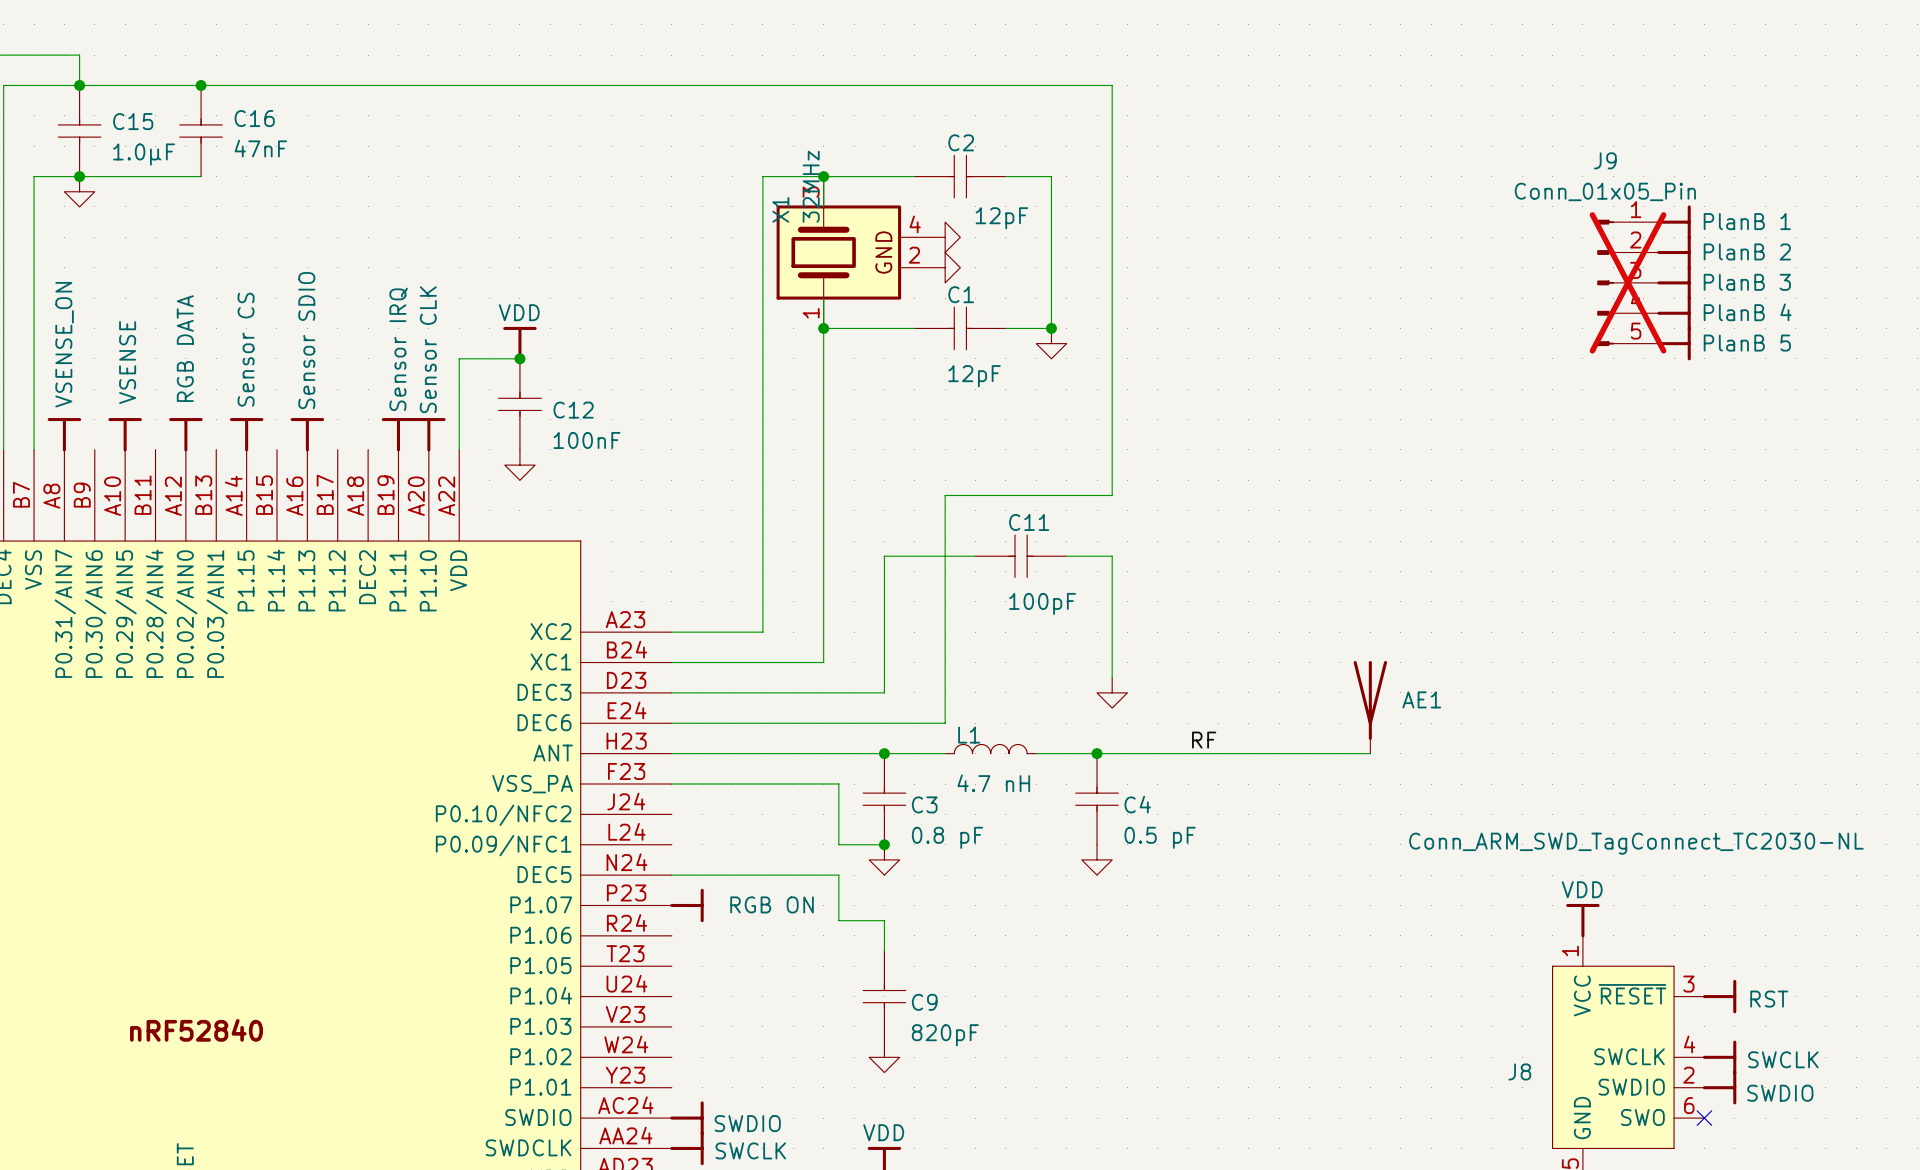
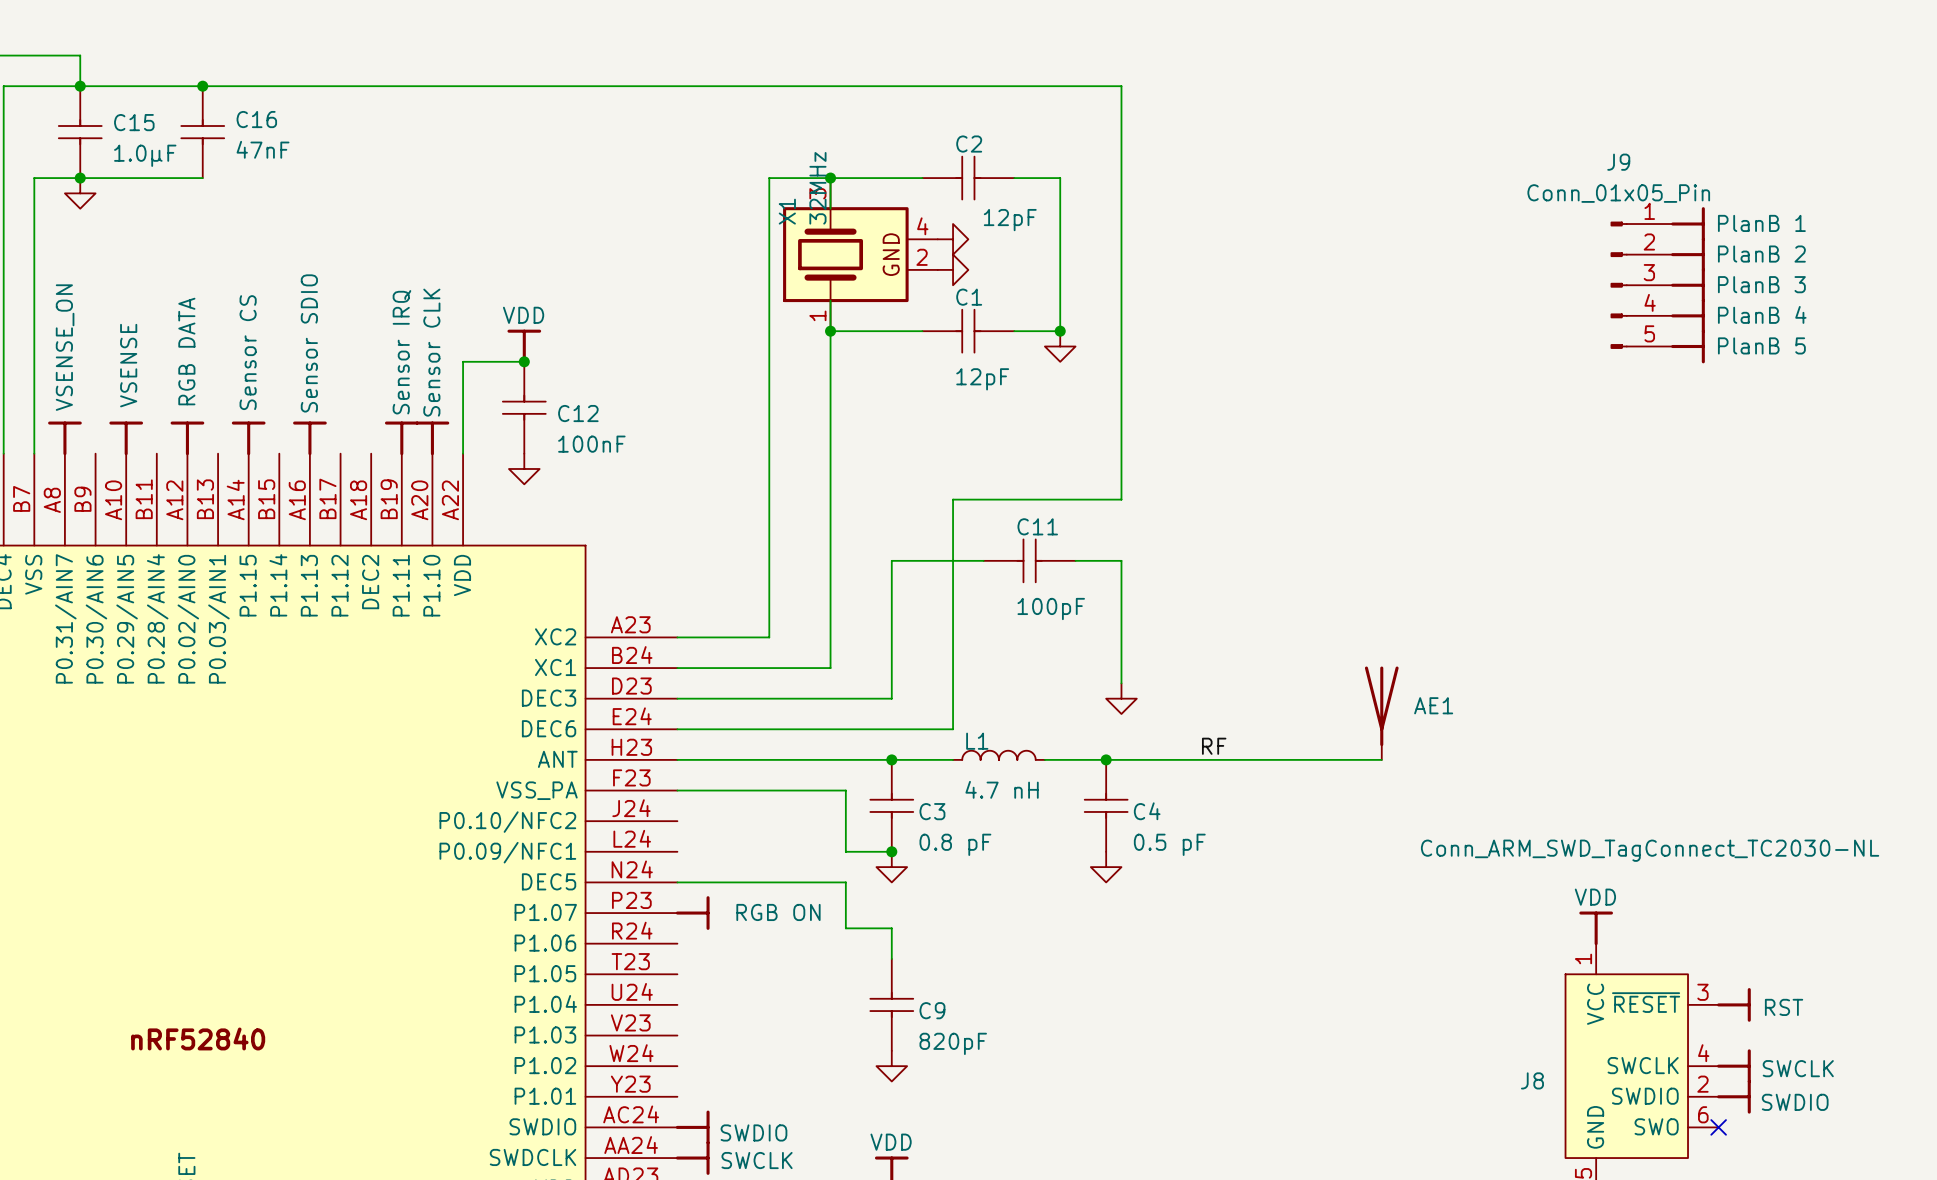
J9 do-not-place cross: (1628, 282) -> none

